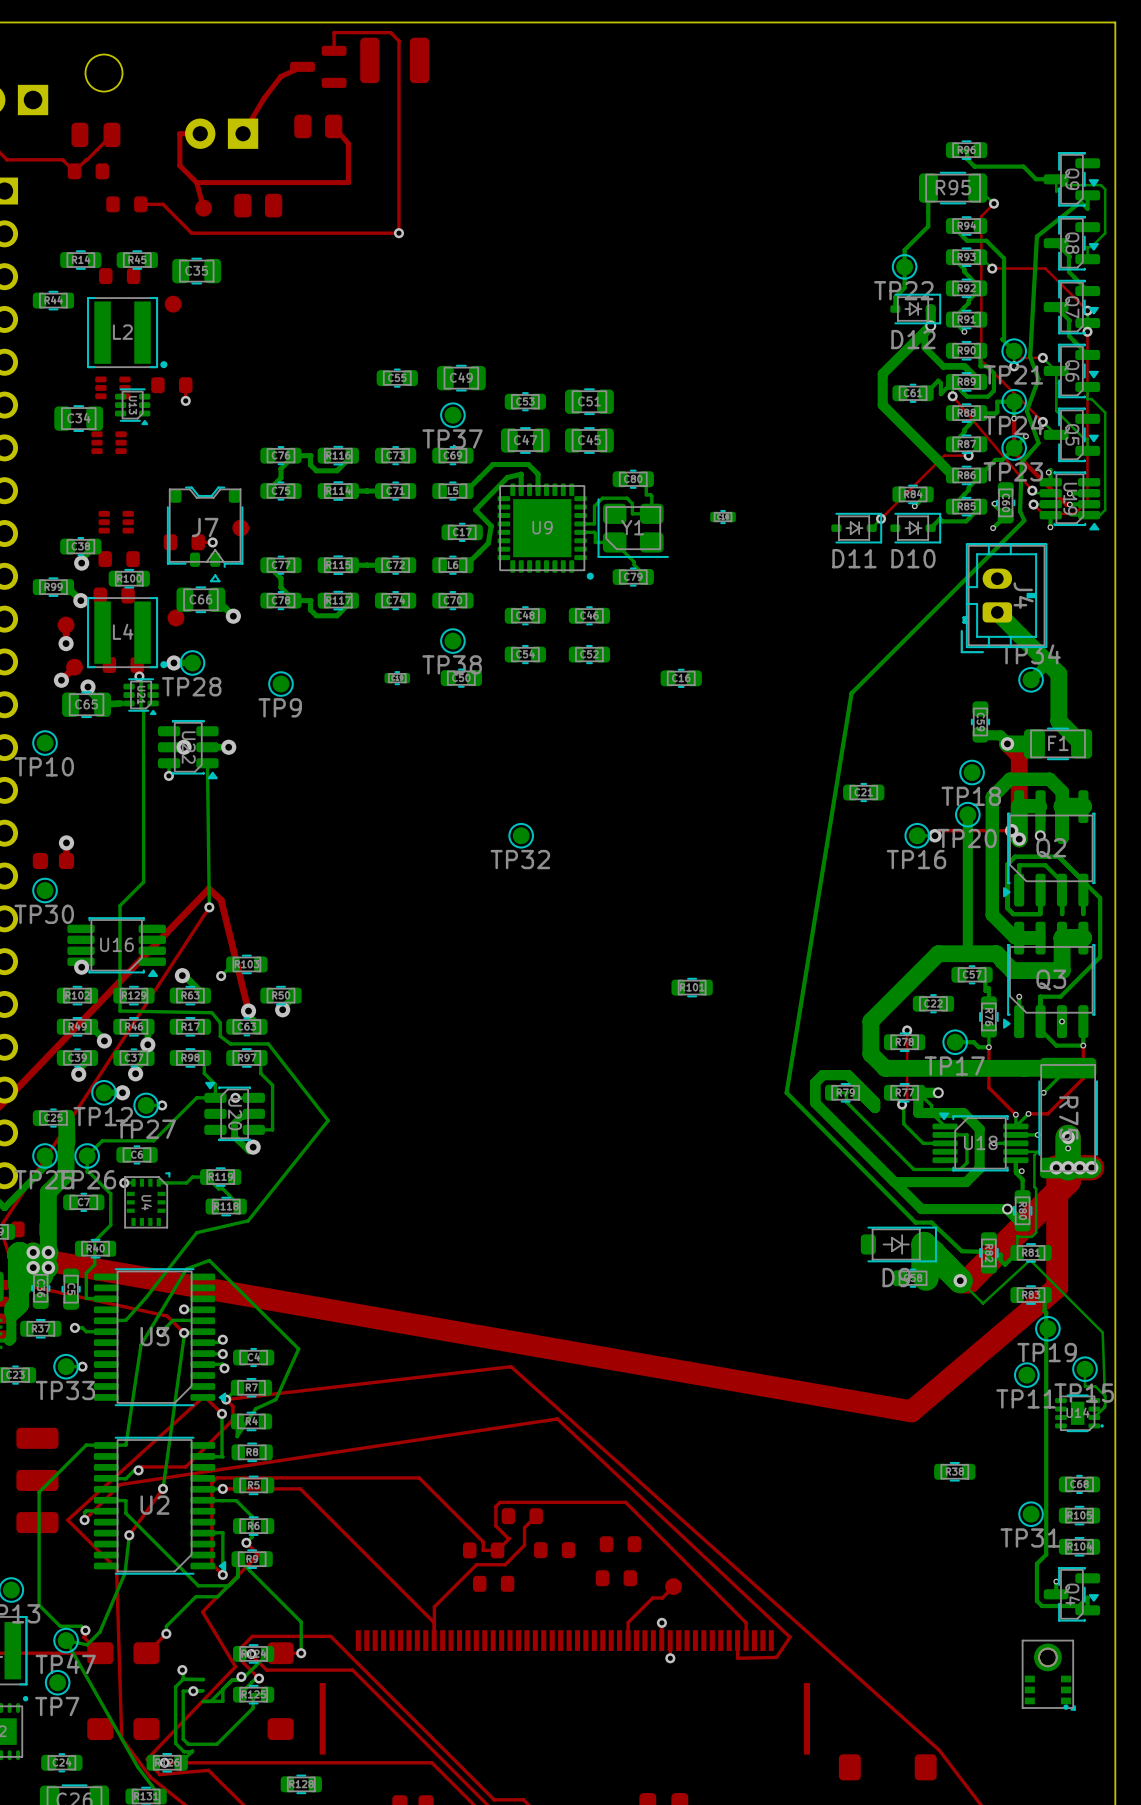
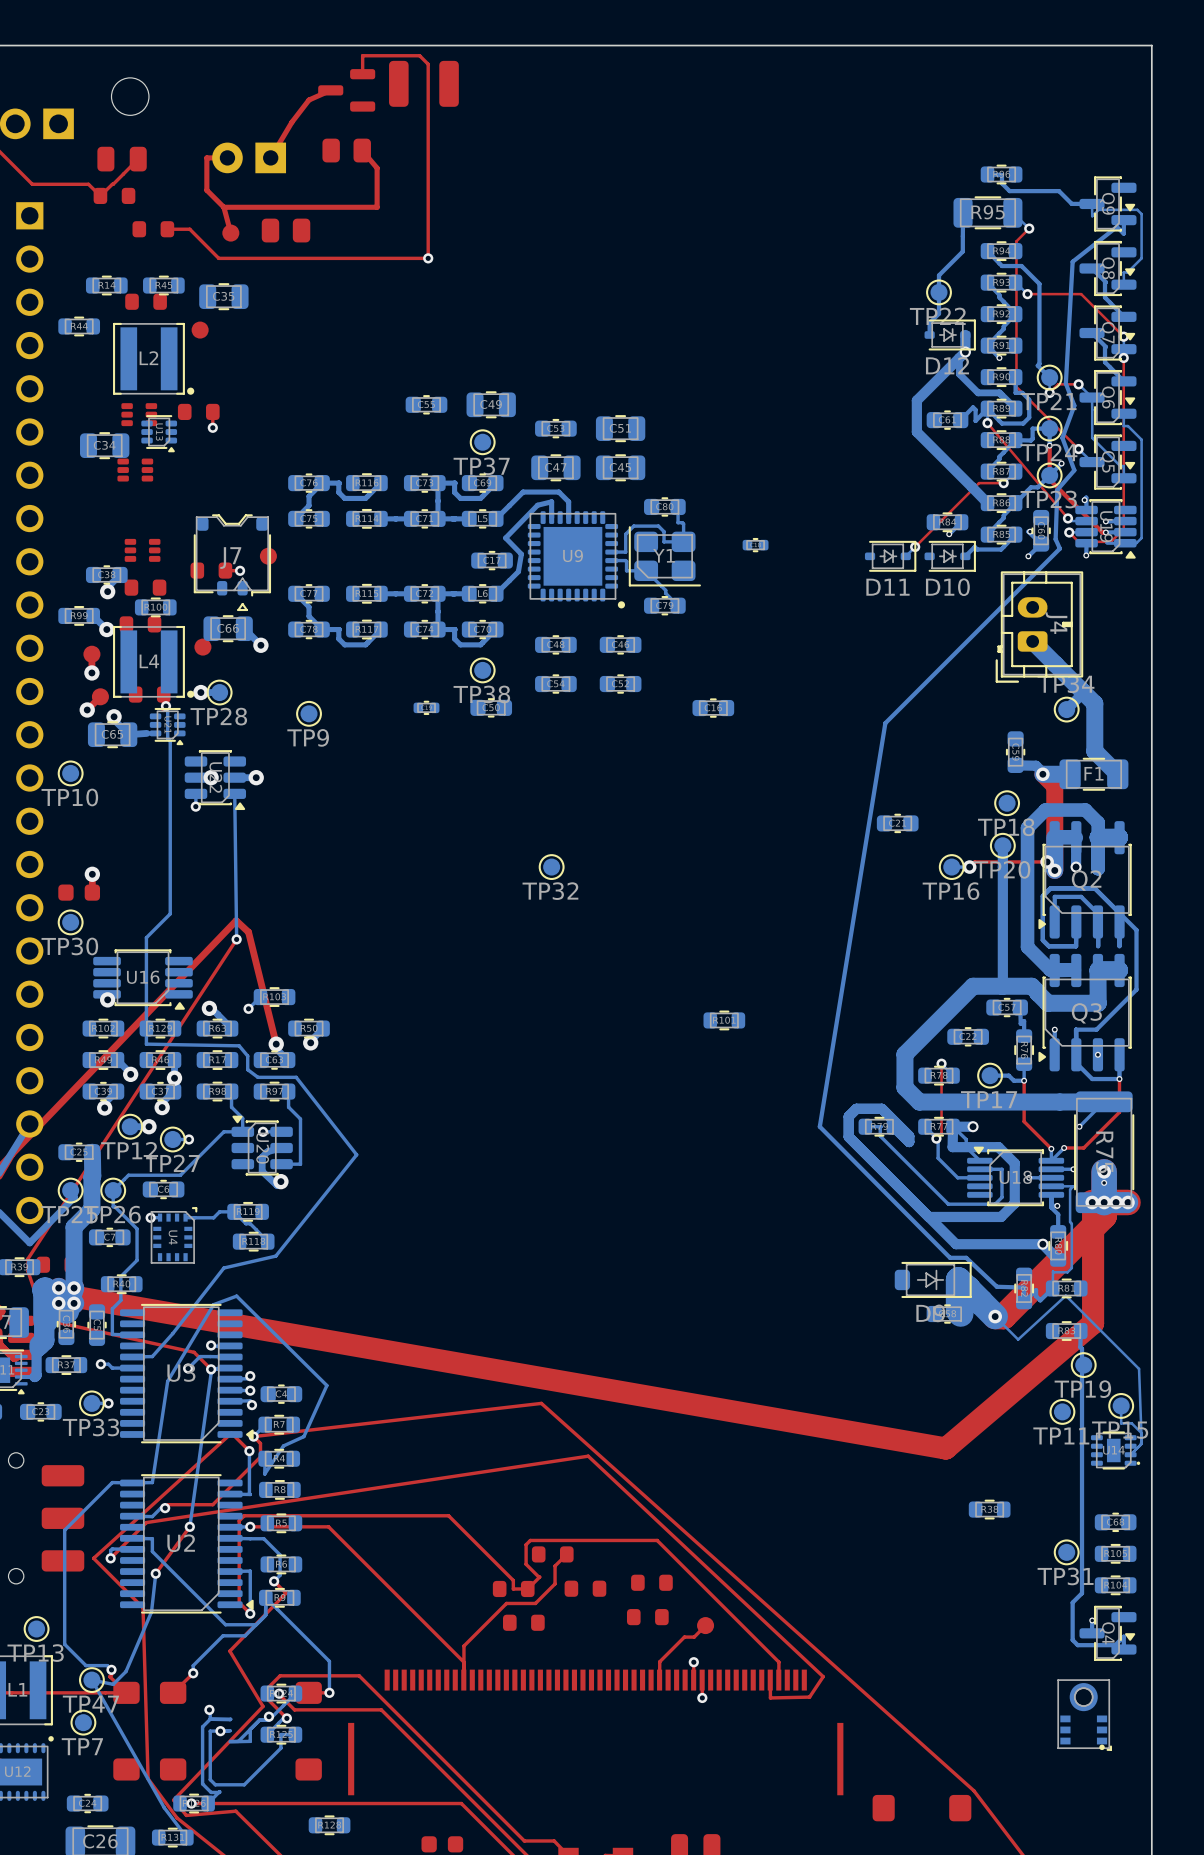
bottom track: none -> (455, 483) (437, 483) (437, 518) (469, 518)
bottom track: none -> (495, 483) (480, 498) (460, 498) (454, 492) (454, 483)
bottom track: none -> (469, 593) (437, 593) (437, 629) (455, 629)
bottom track: none -> (495, 629) (480, 644) (460, 644) (454, 638) (454, 629)

